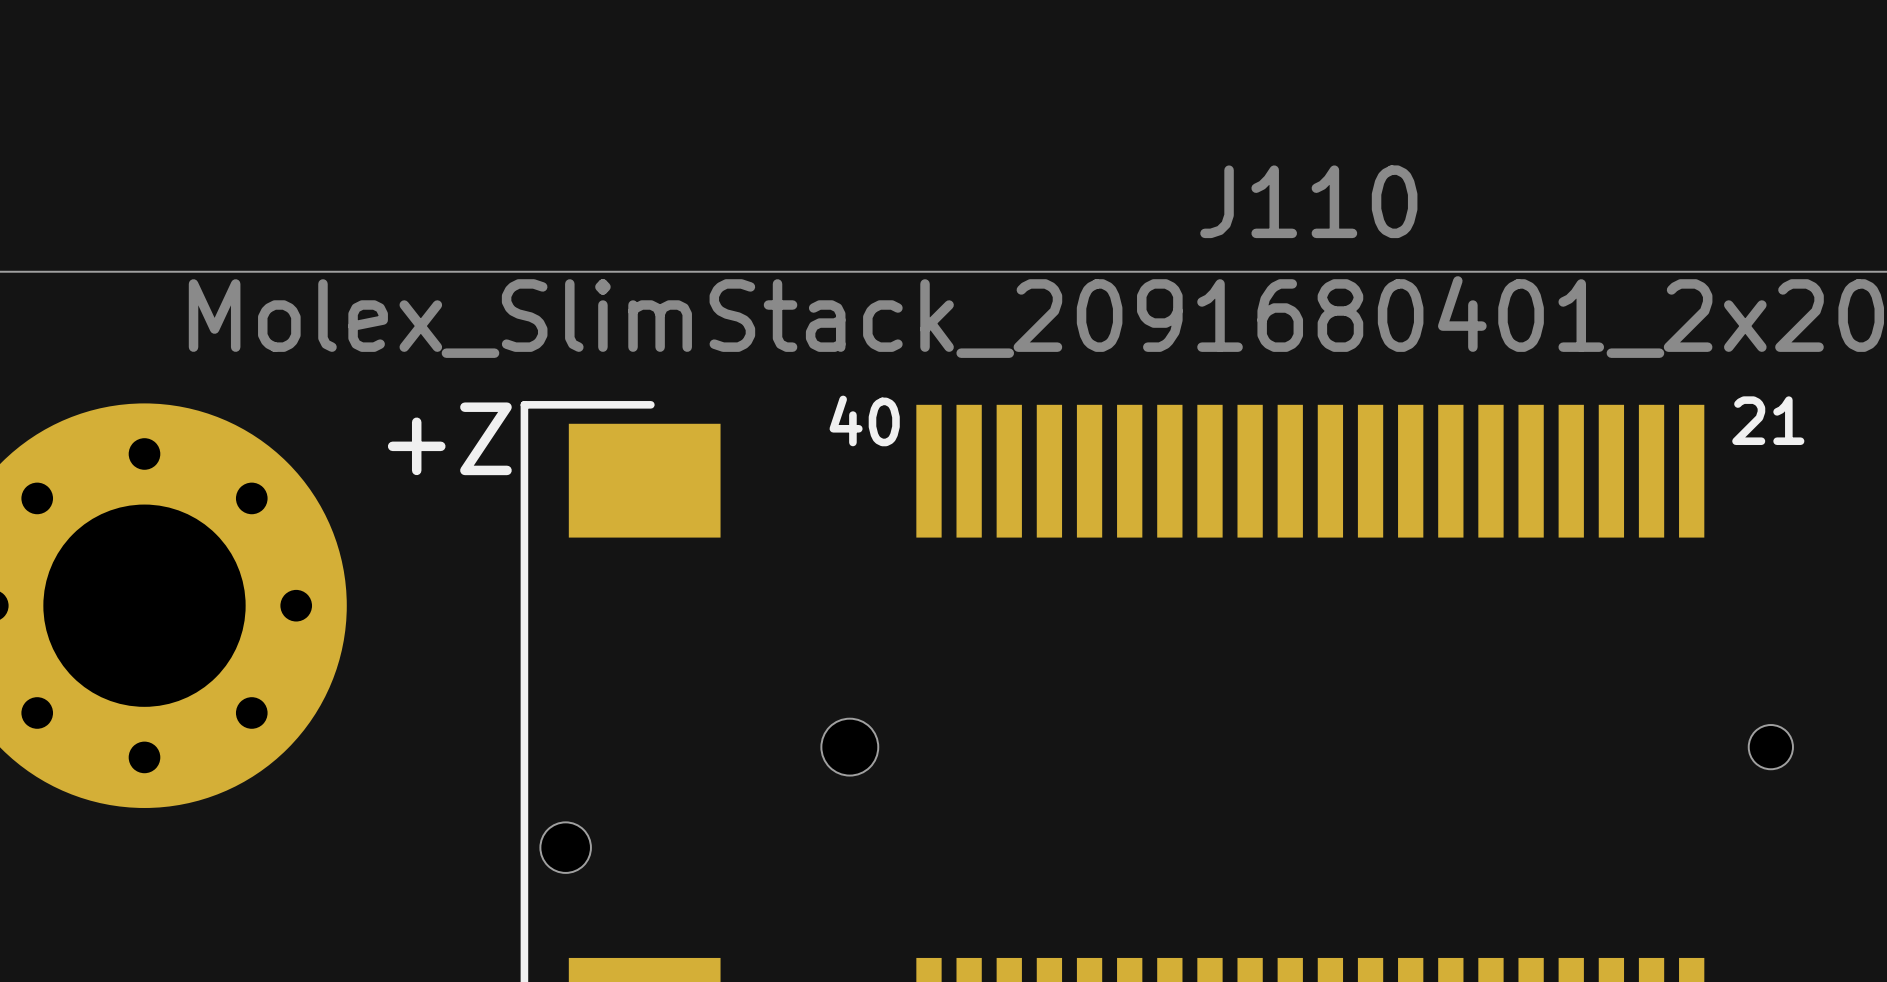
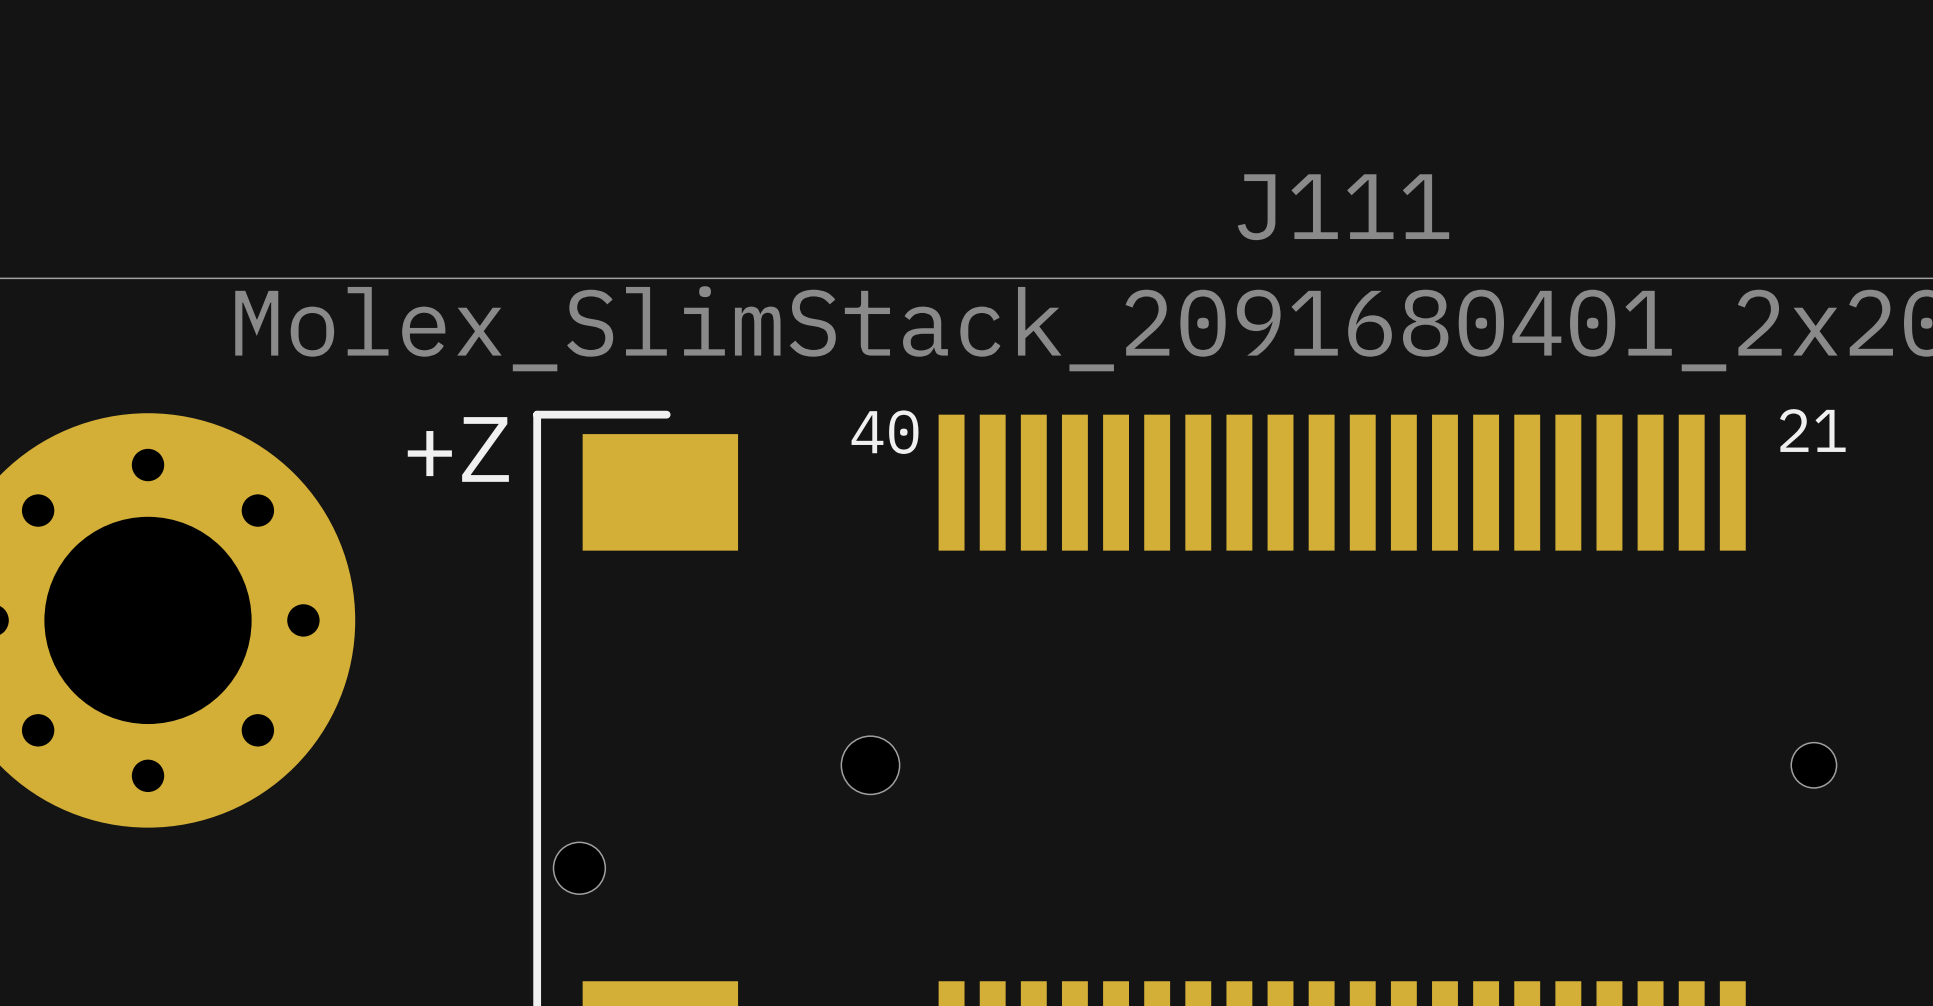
J110 name: J110 (1308, 201) -> J111 (1343, 207)

